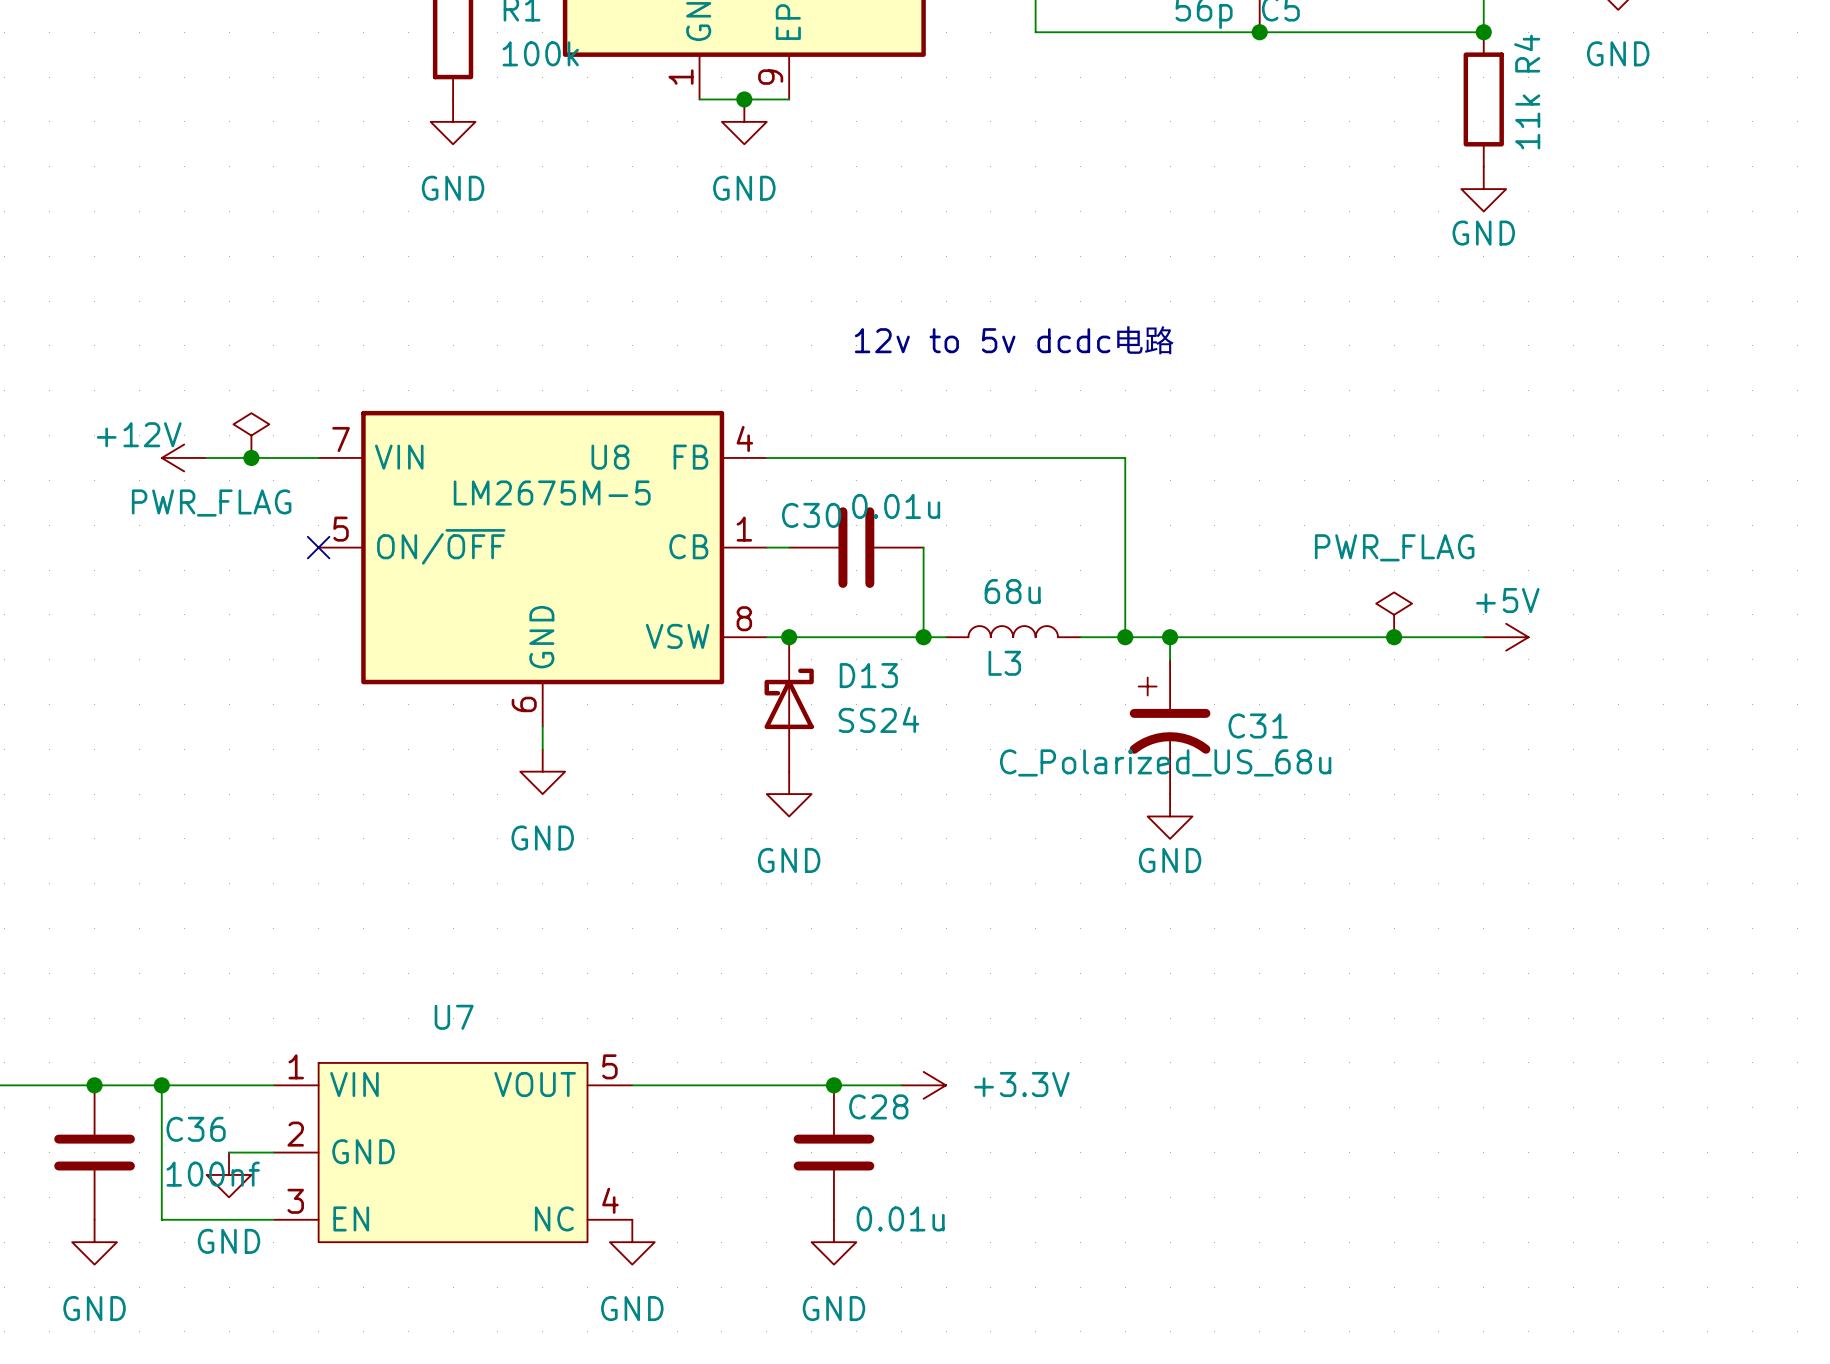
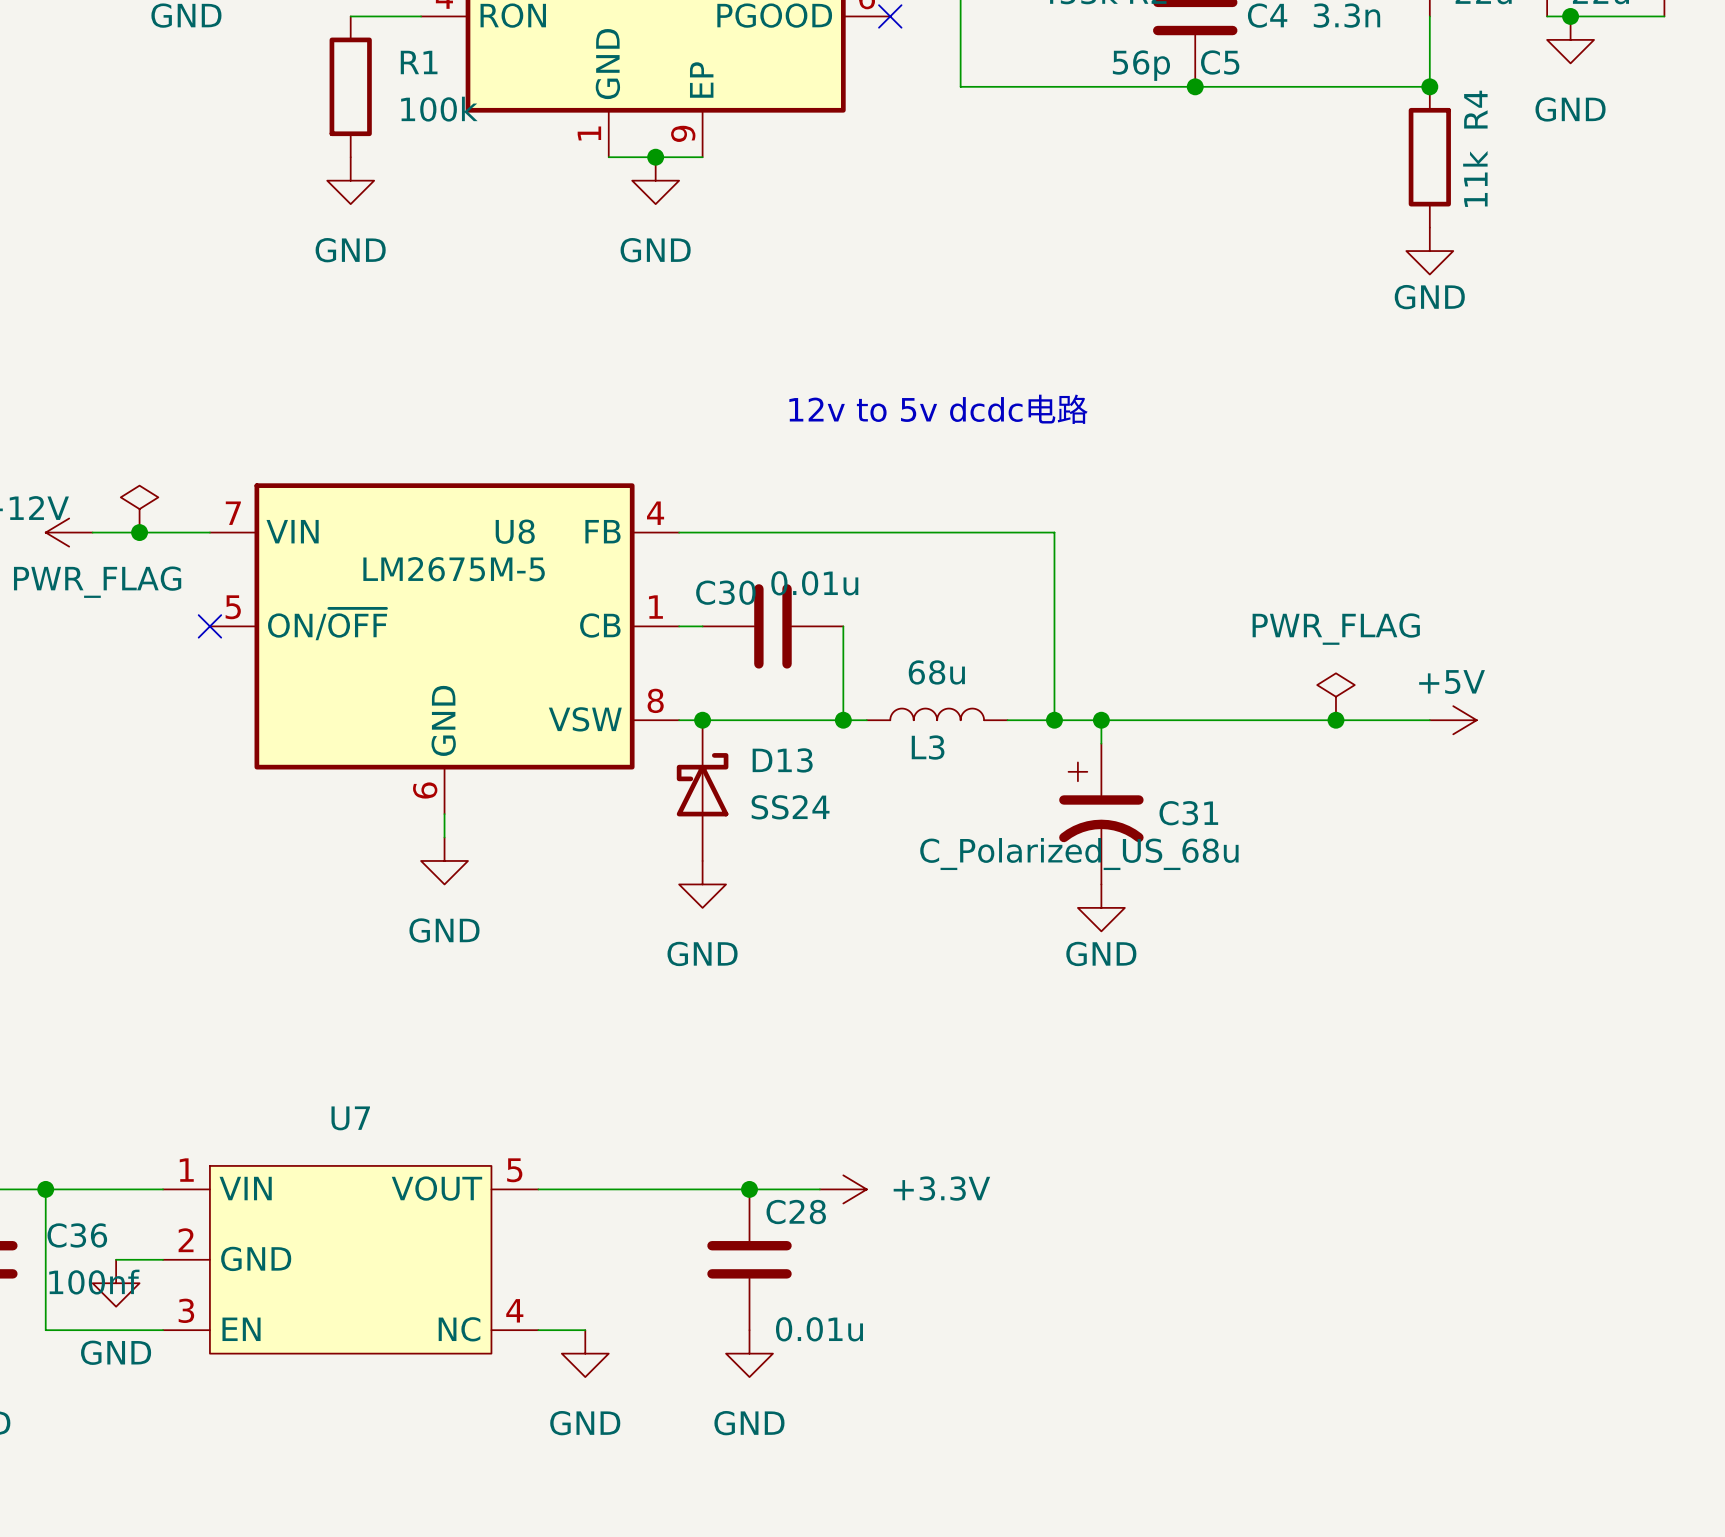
wire: none -> (538, 1330) (585, 1330)
power symbol position: GND (632, 1242) -> GND (585, 1353)

